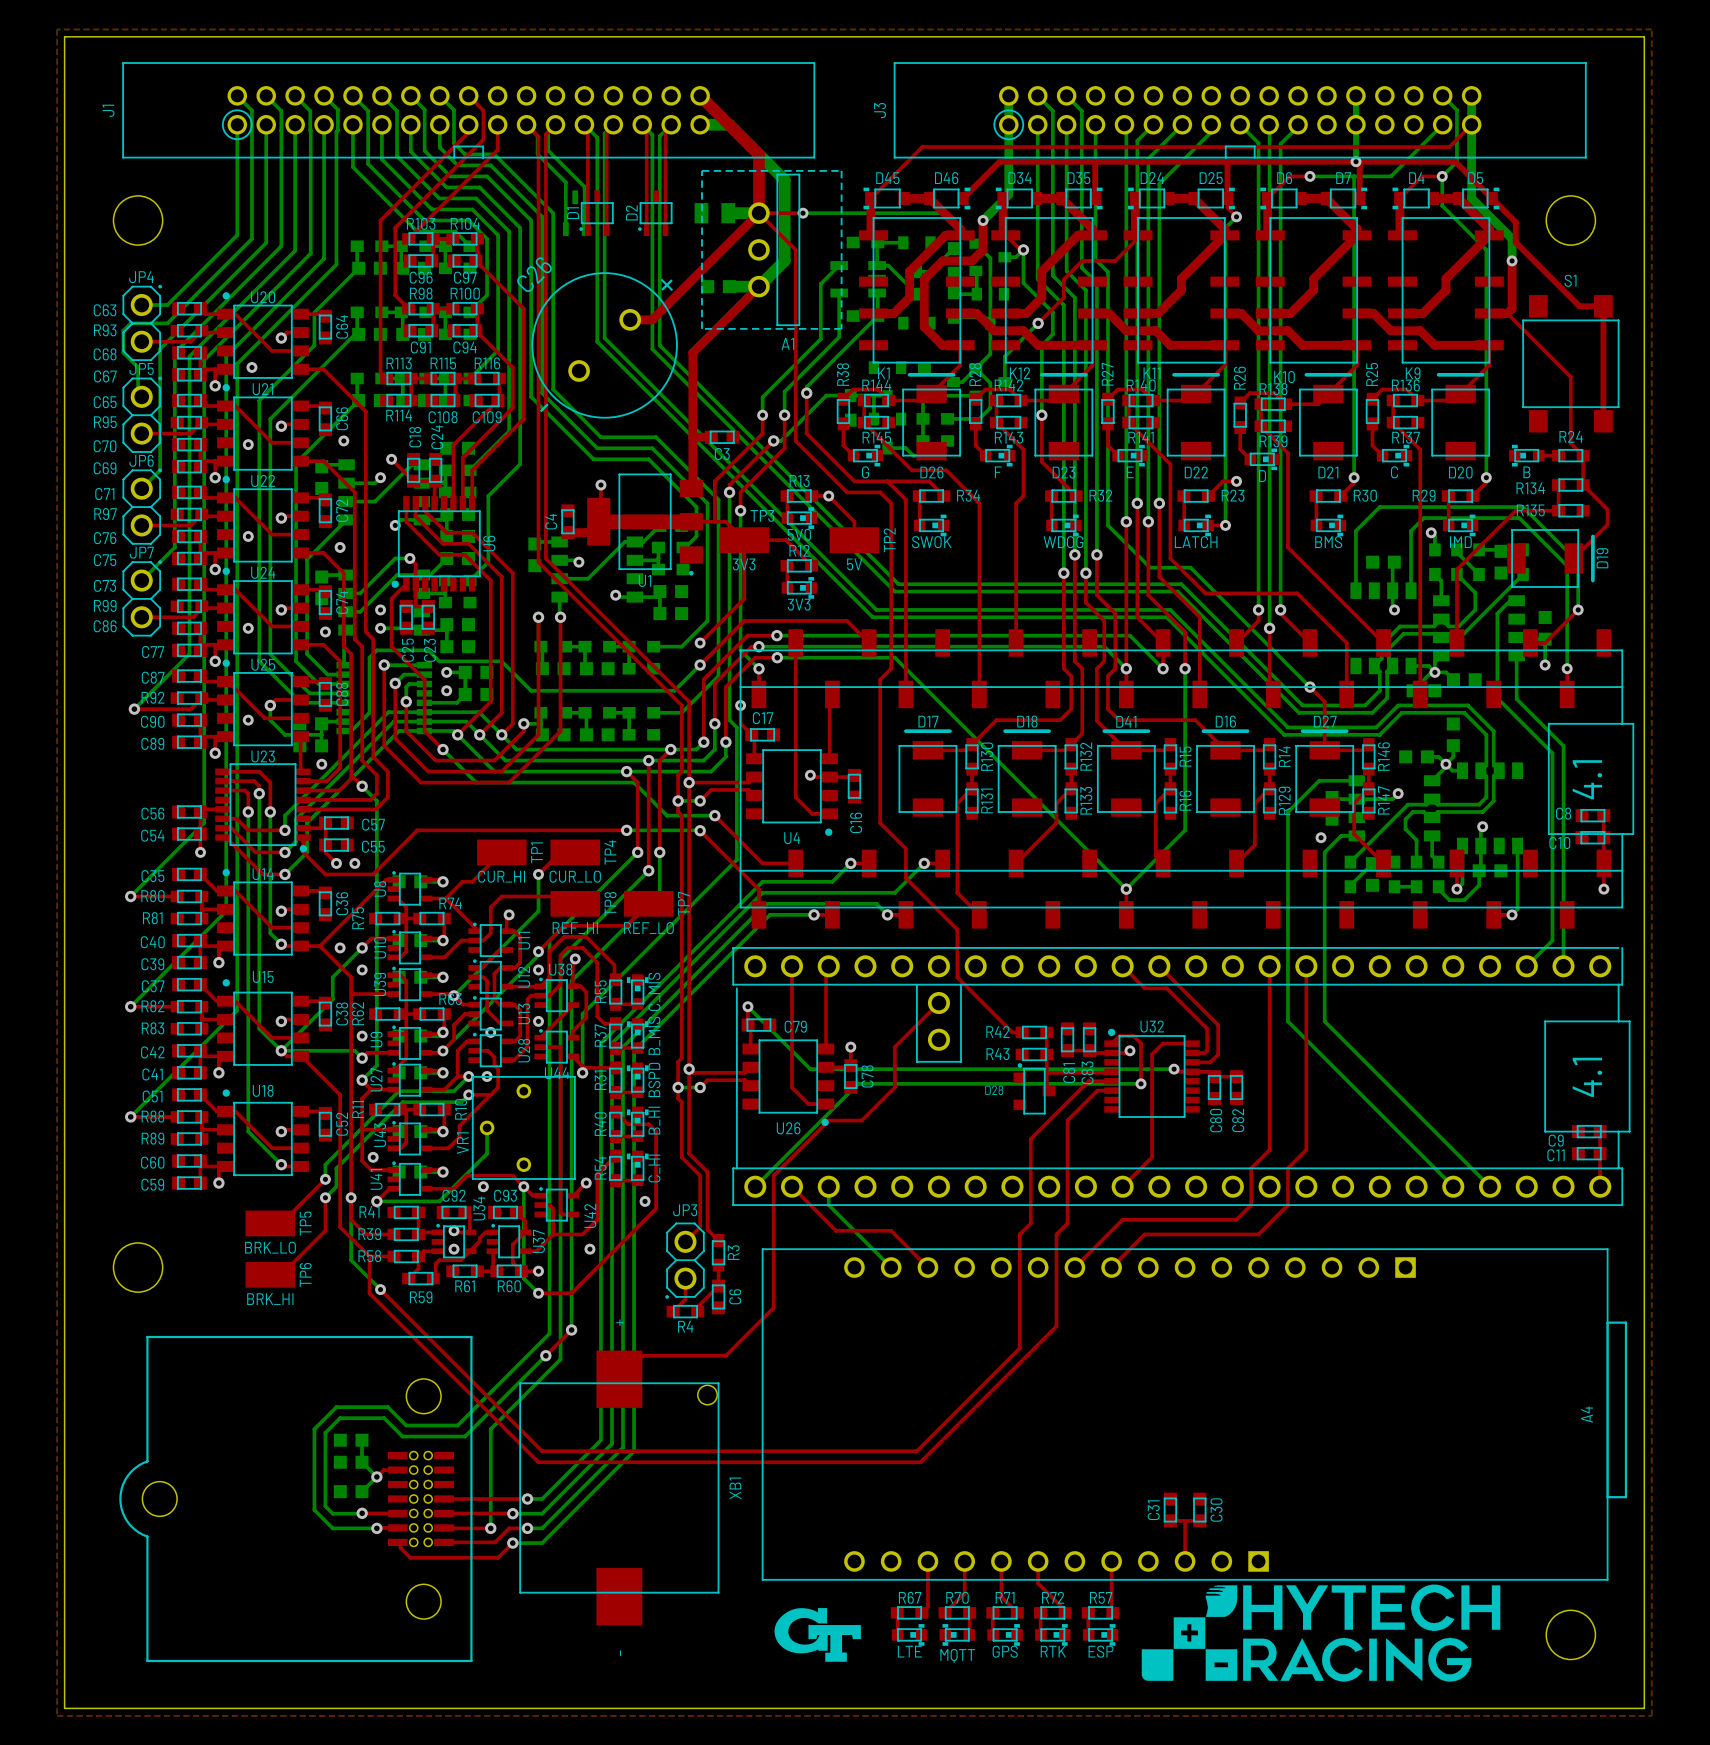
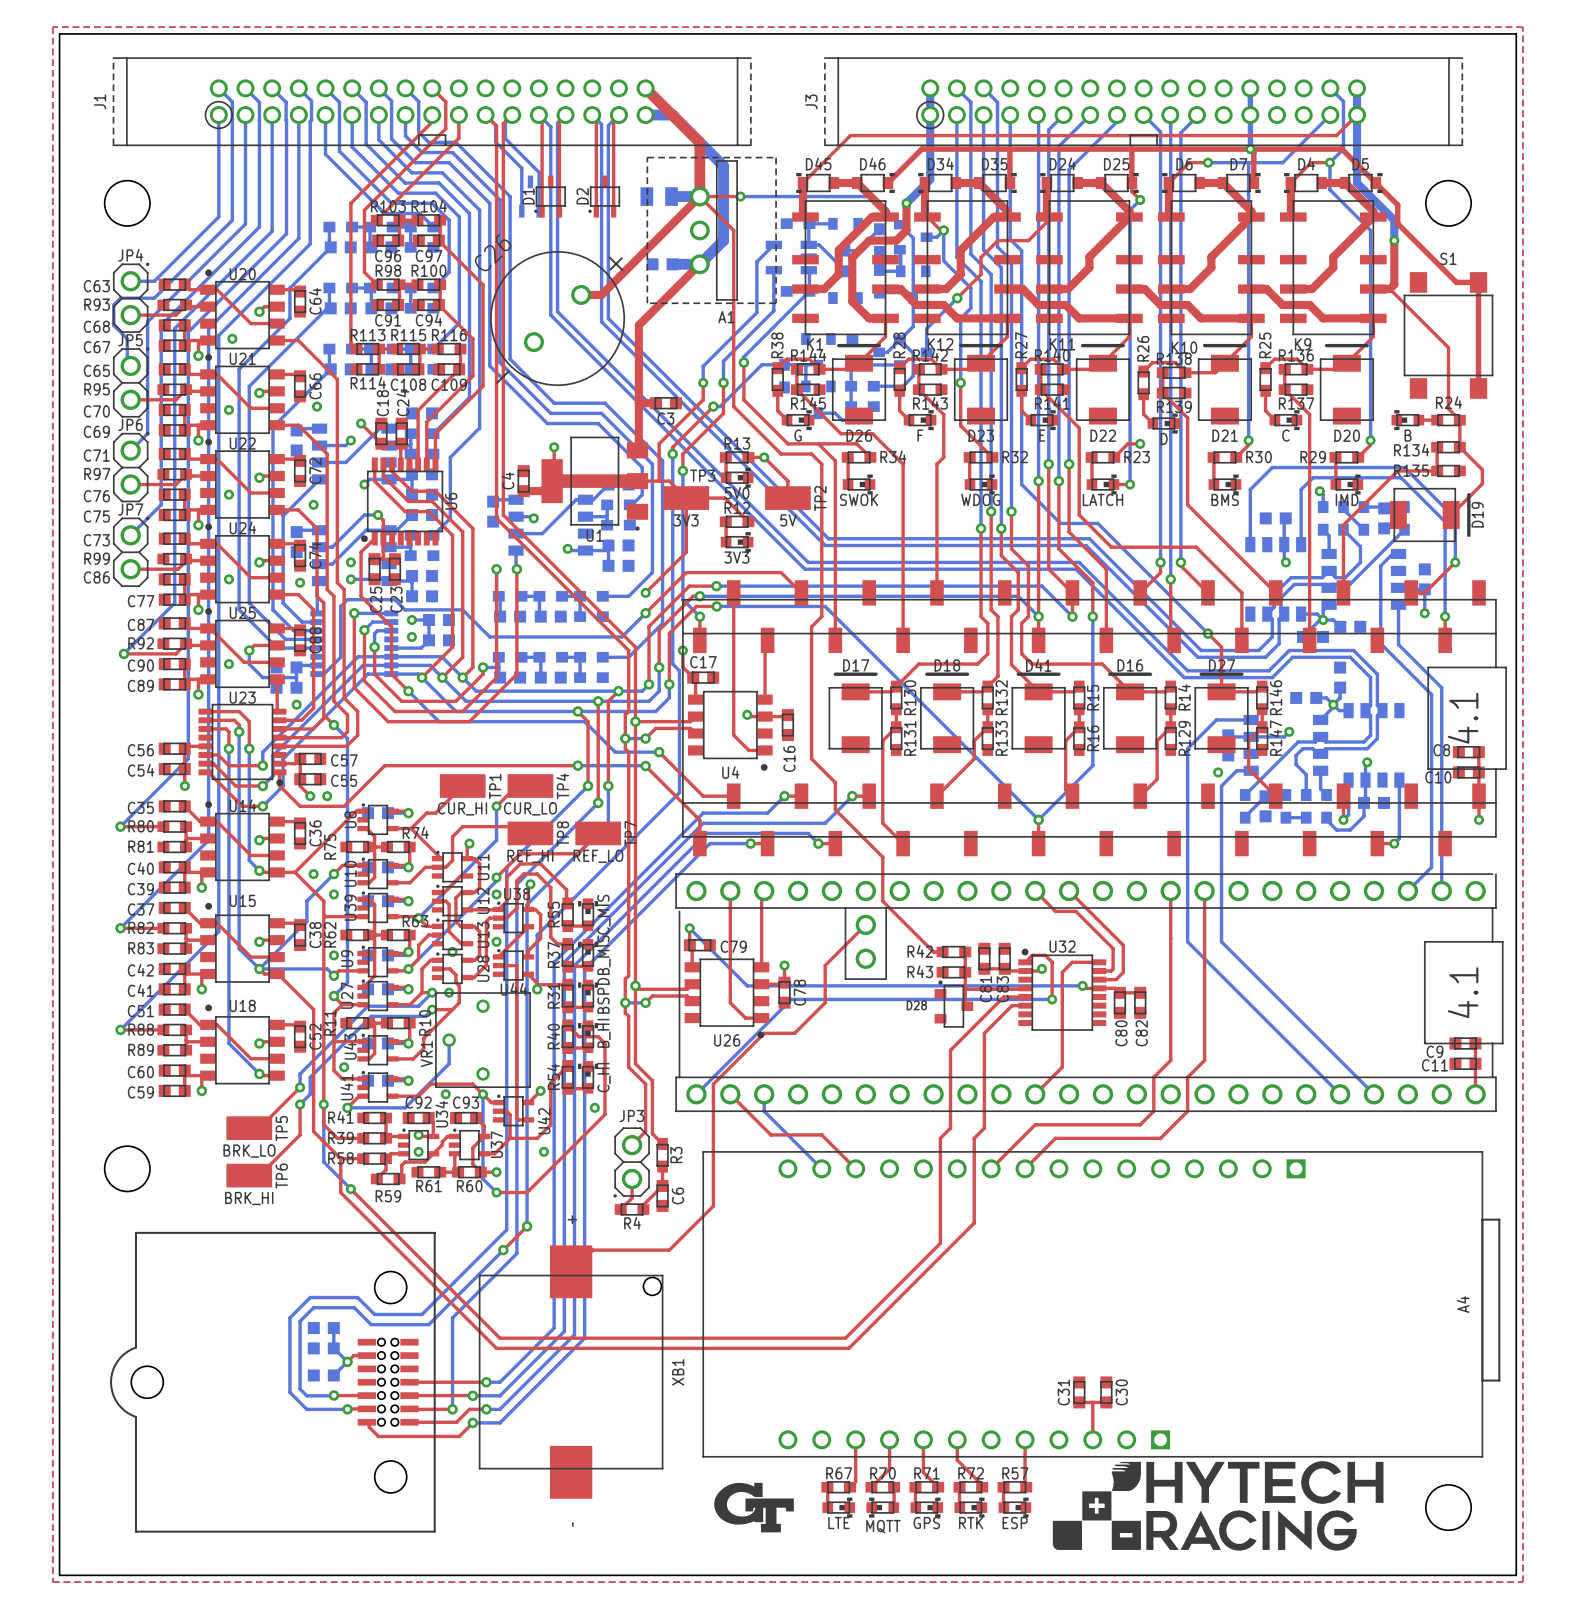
J1 footprint: [122, 62, 816, 159] -> [112, 57, 752, 147]
J3 footprint: [893, 62, 1587, 159] -> [824, 57, 1464, 147]

